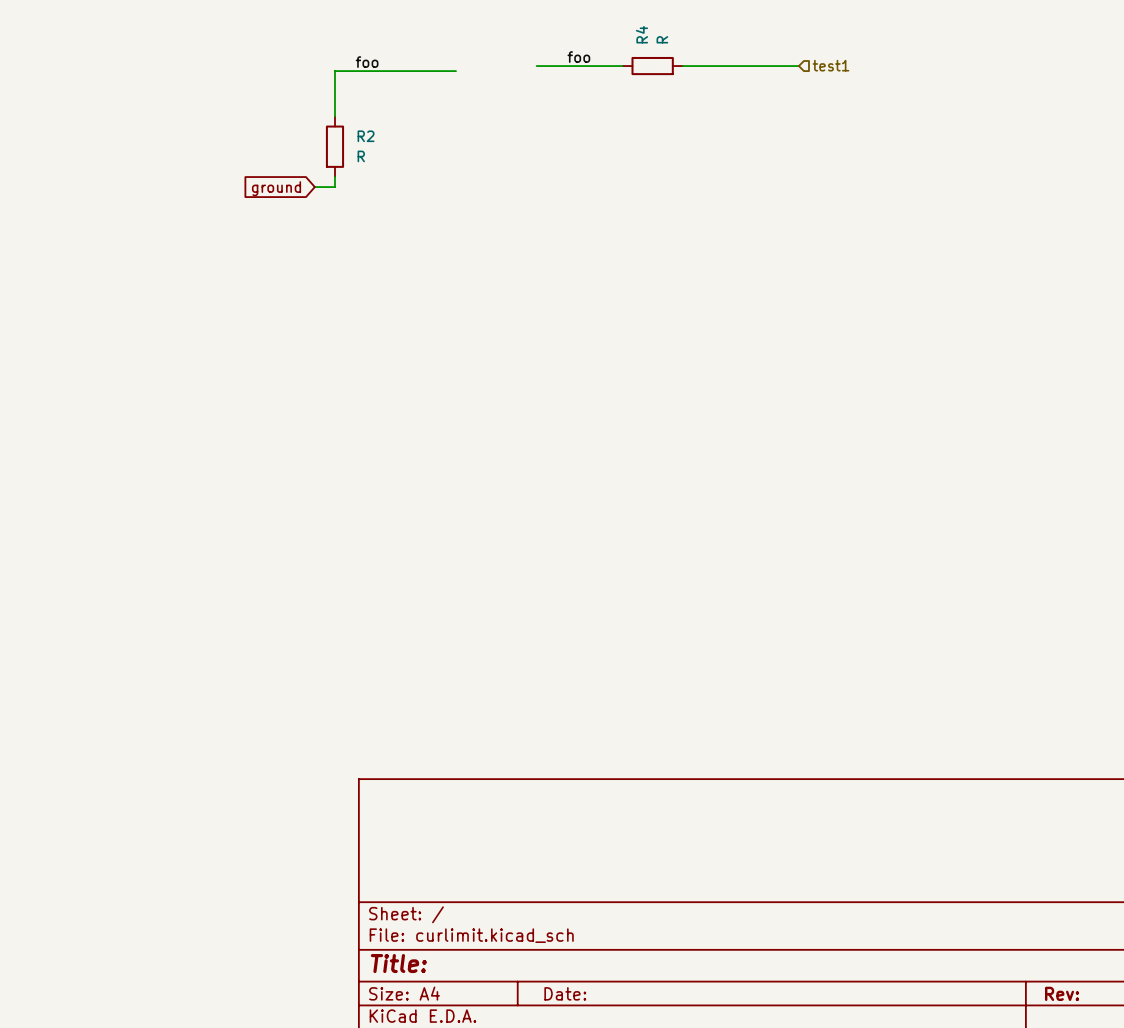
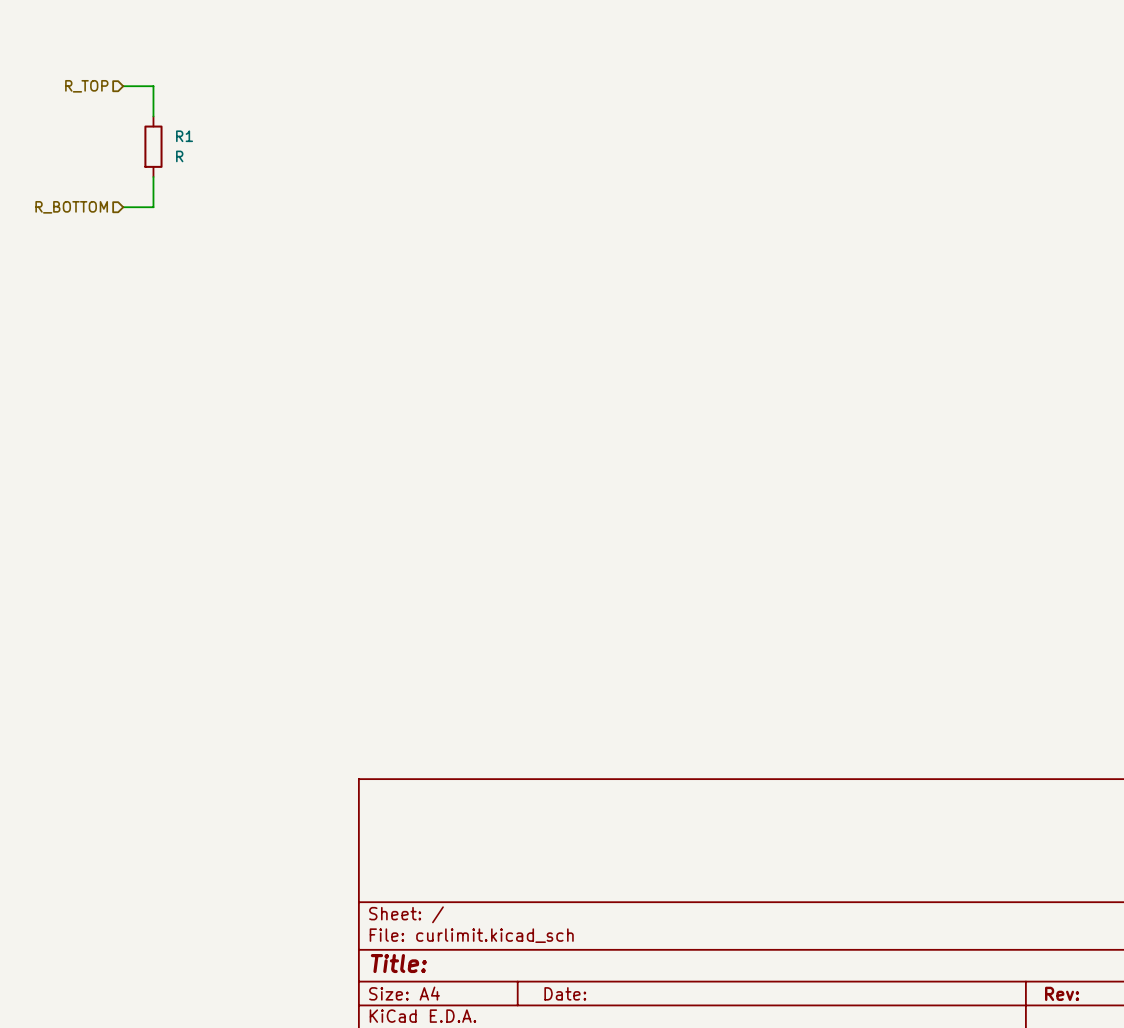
label: foo (578, 57) -> none
label: foo (367, 62) -> none
hierarchical label: test1 (830, 65) -> none
wire: (536, 66) (622, 66) -> none
R4: R (652, 66) -> none
wire: (682, 66) (798, 66) -> none
wire: (456, 71) (335, 71) (335, 116) -> none
hierarchical label: none -> R_TOP (86, 86)
wire: none -> (123, 86) (153, 86) (153, 116)
R1: none -> R (153, 146)
R2: R (335, 146) -> none
wire: none -> (153, 176) (153, 207) (123, 207)
wire: (335, 176) (335, 187) (314, 187) -> none
global label: ground (276, 188) -> none
hierarchical label: none -> R_BOTTOM (71, 207)

